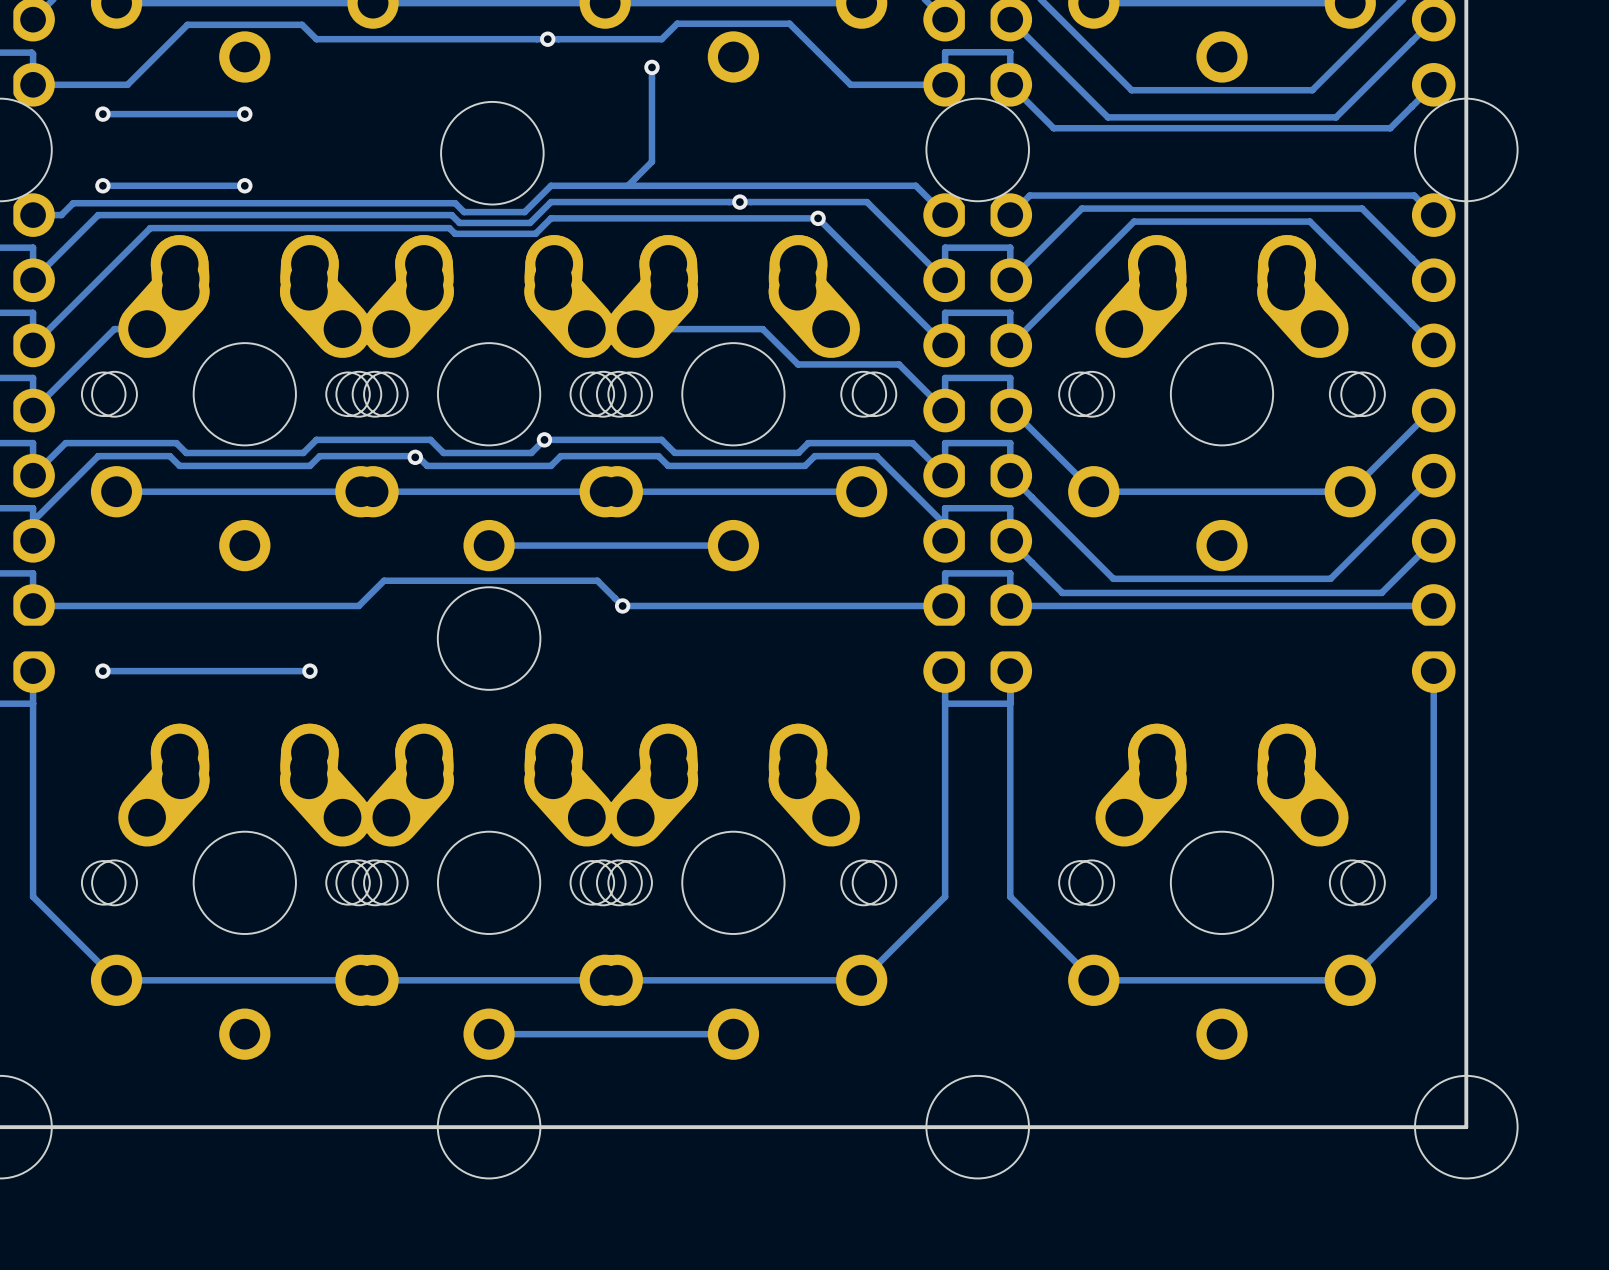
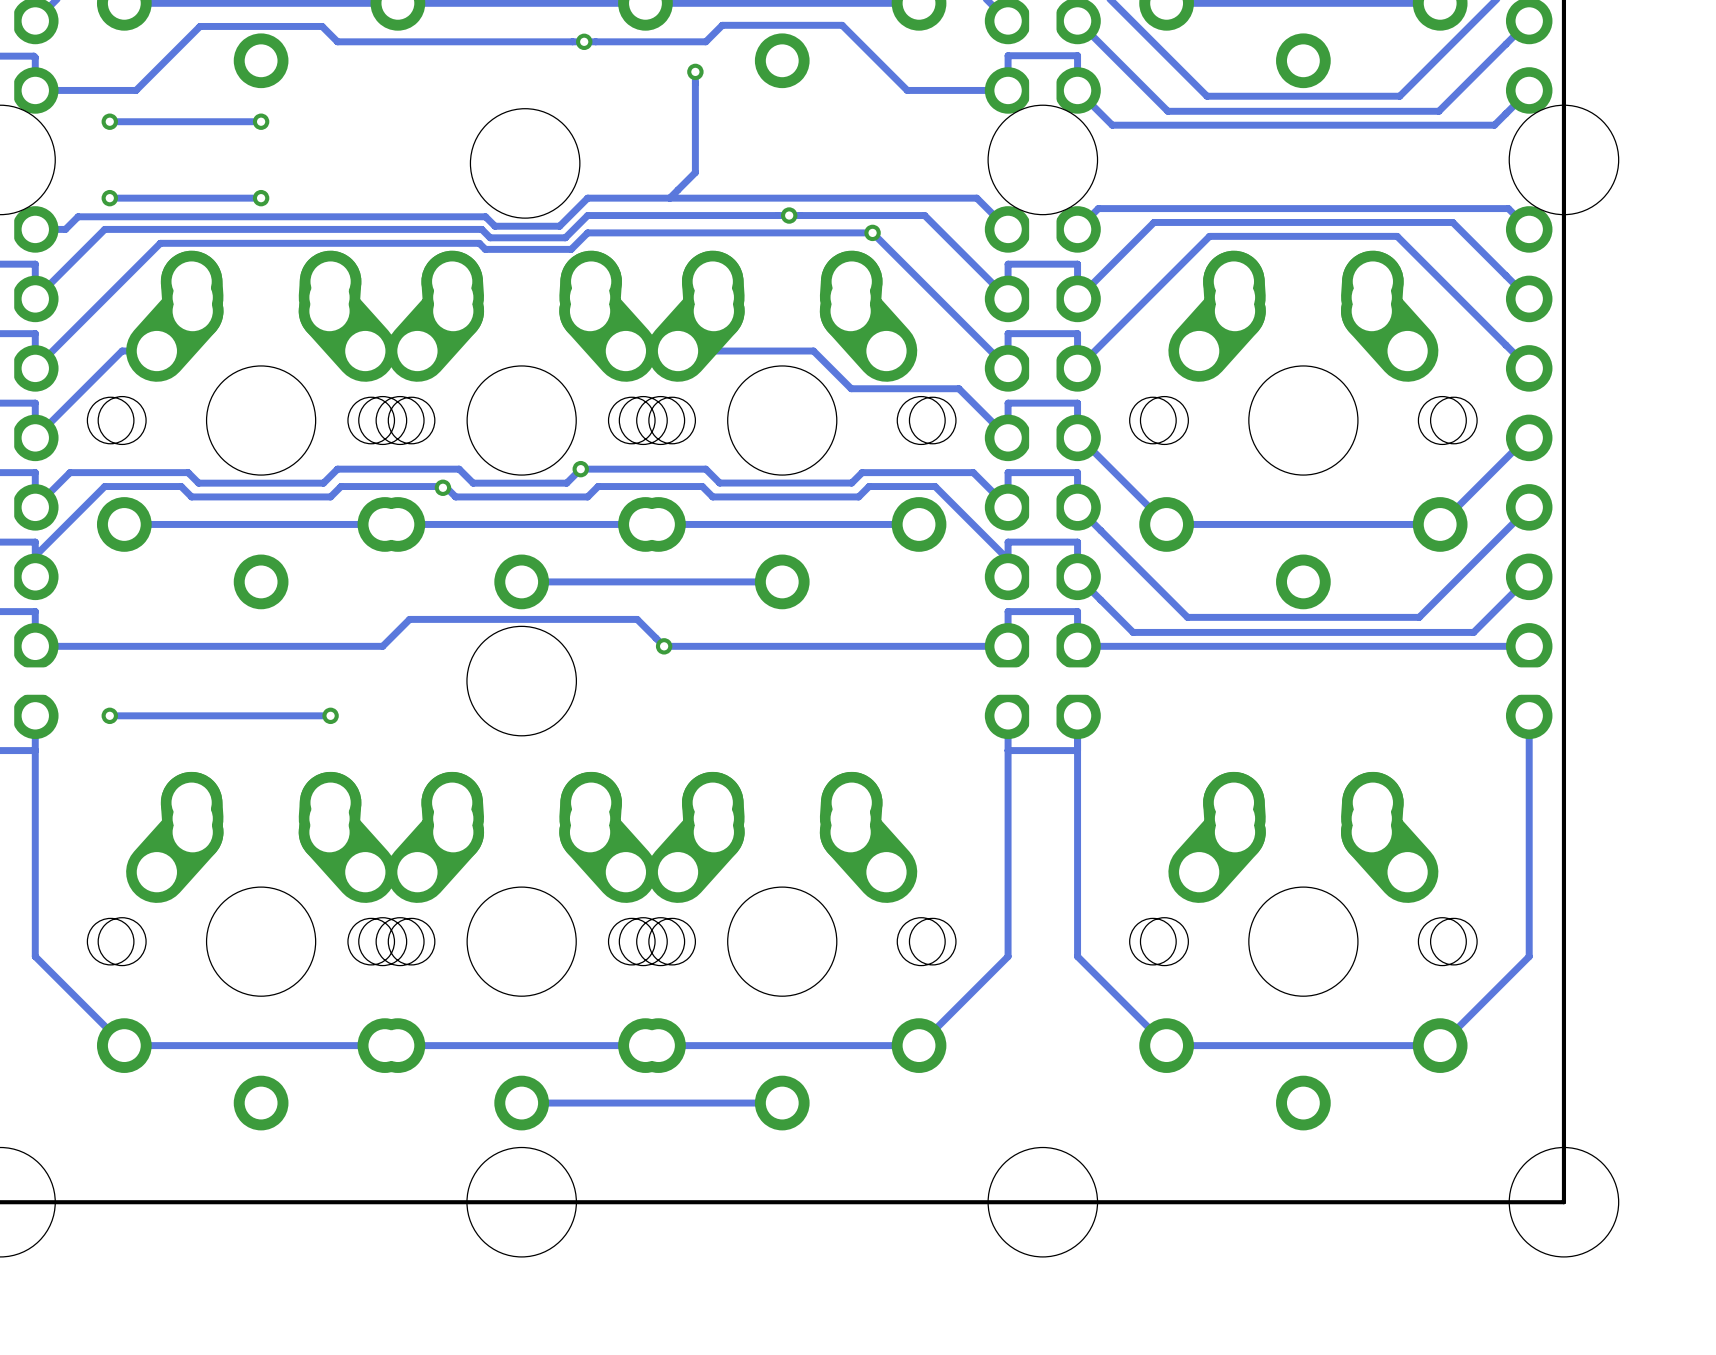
track: (1094, 104) (1107, 117) -> (1112, 125) (1181, 125)
track: (1349, 104) (1336, 117) -> (1494, 125) (1424, 125)
track: none -> (1438, 111) (1167, 111)
track: (1401, 117) (1390, 128) (1053, 128) (1042, 117) -> none

